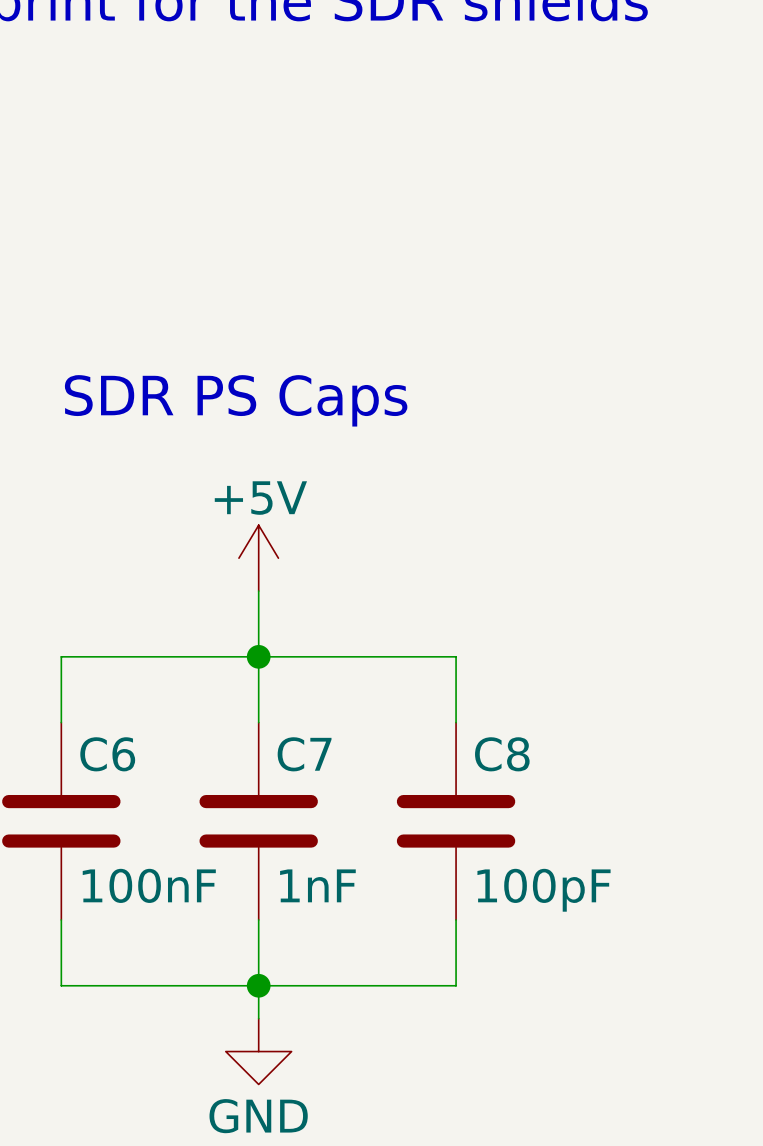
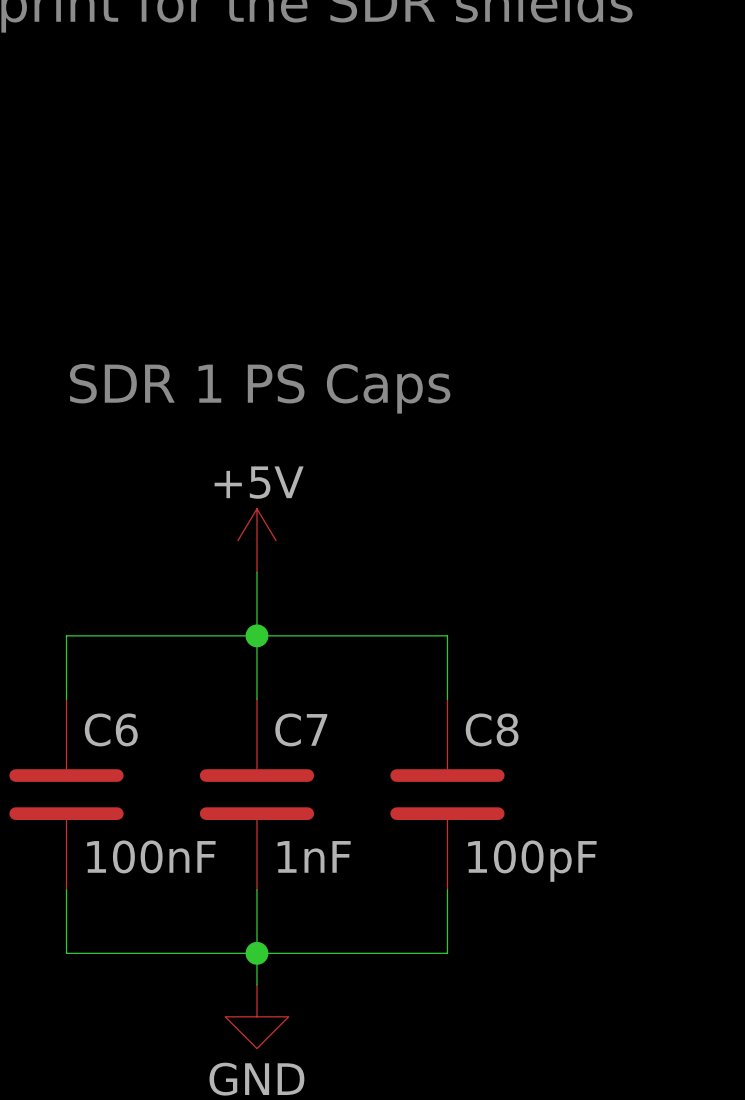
text: SDR PS Caps (236, 400) -> SDR 1 PS Caps (260, 388)

